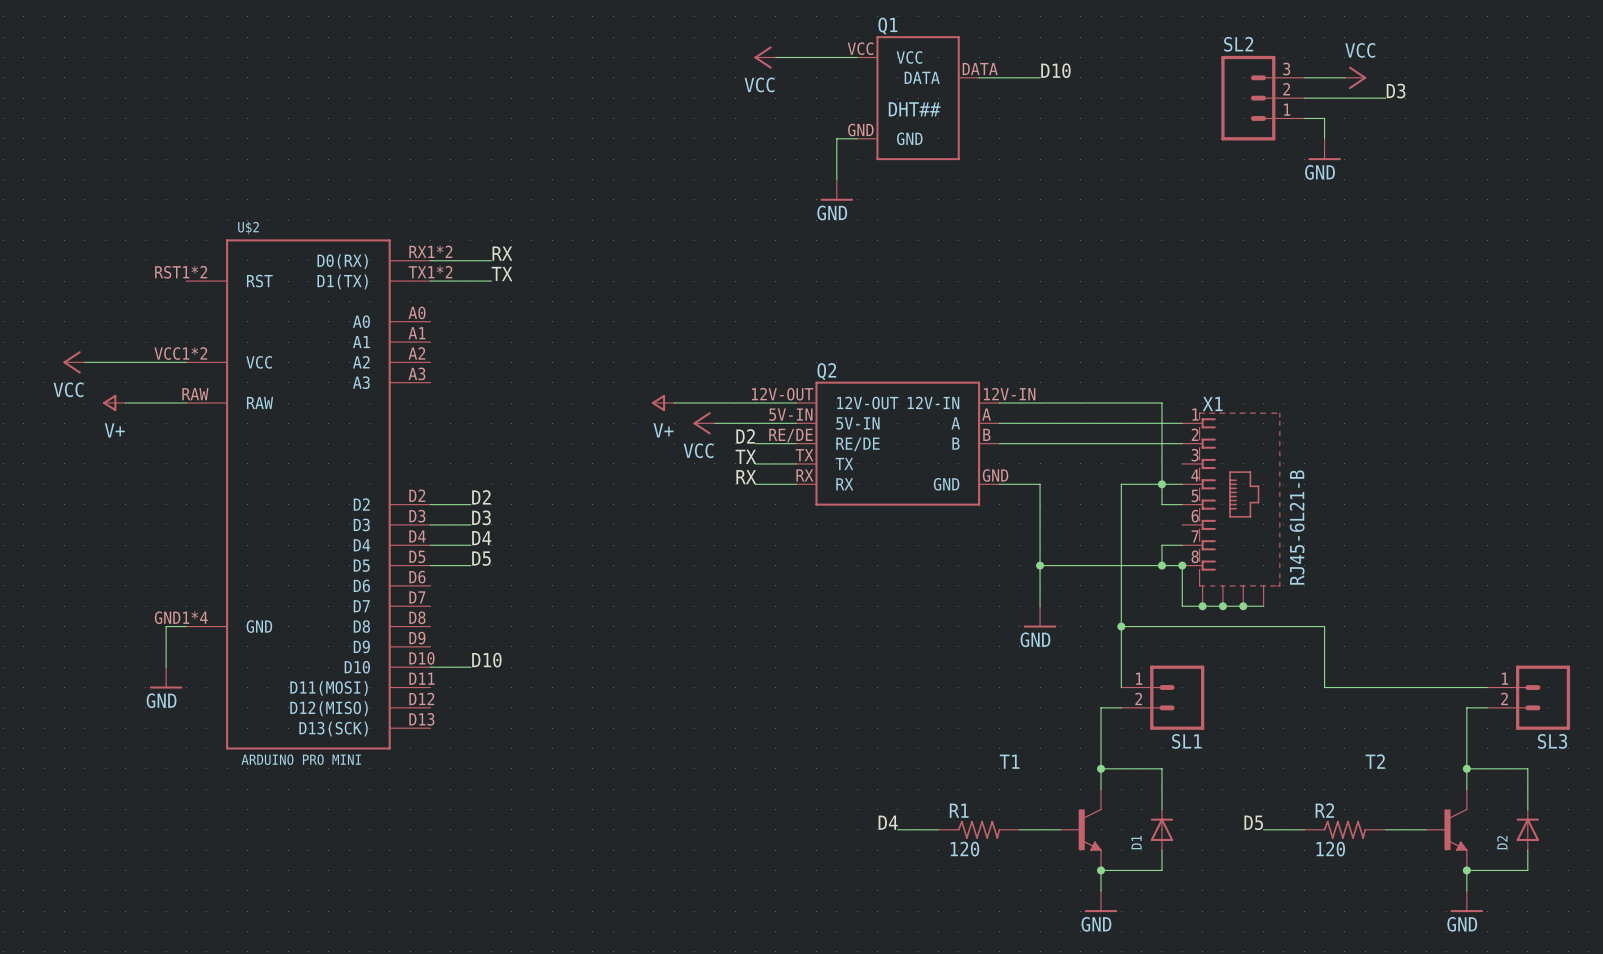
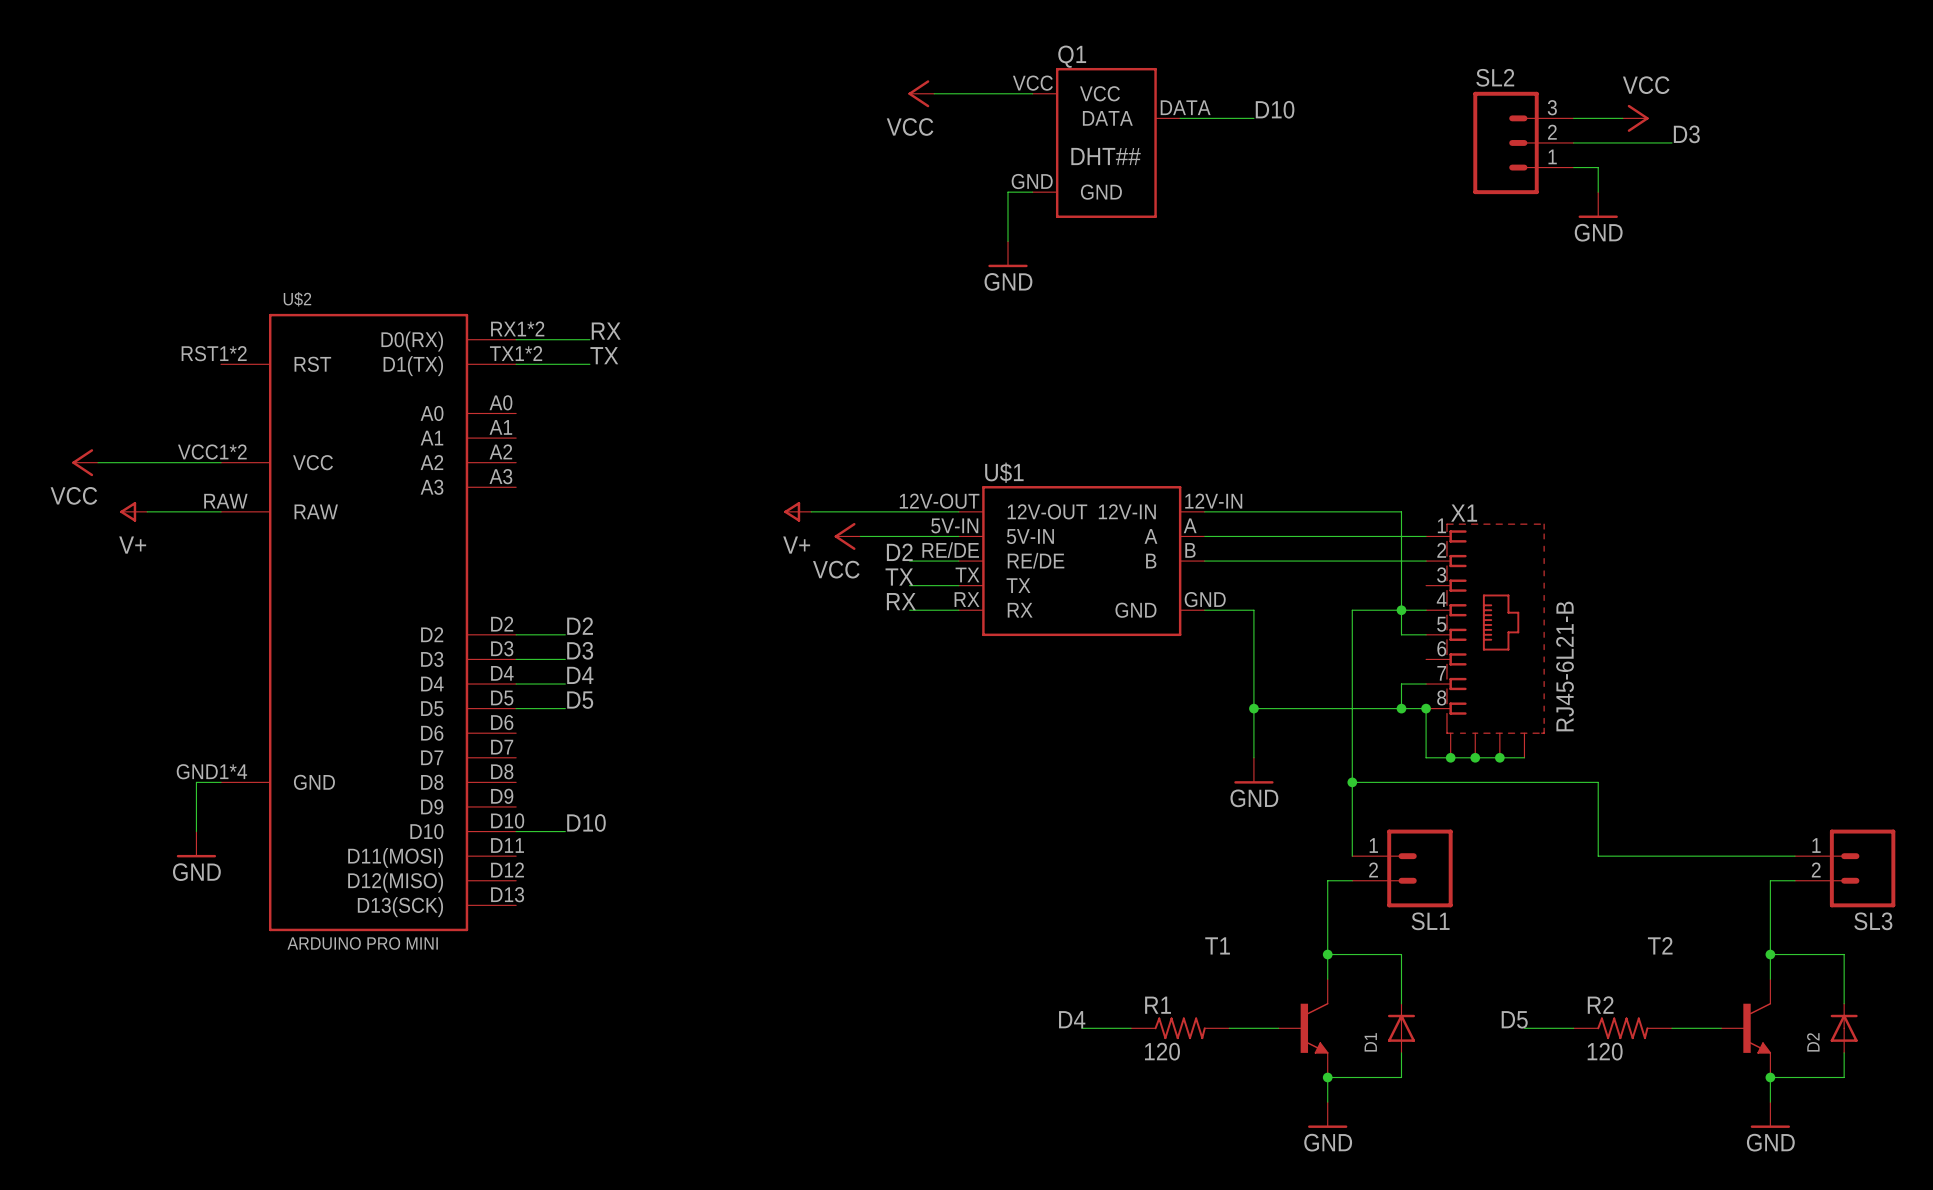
Q2 name: Q2 (826, 371) -> U$1 (1004, 472)

